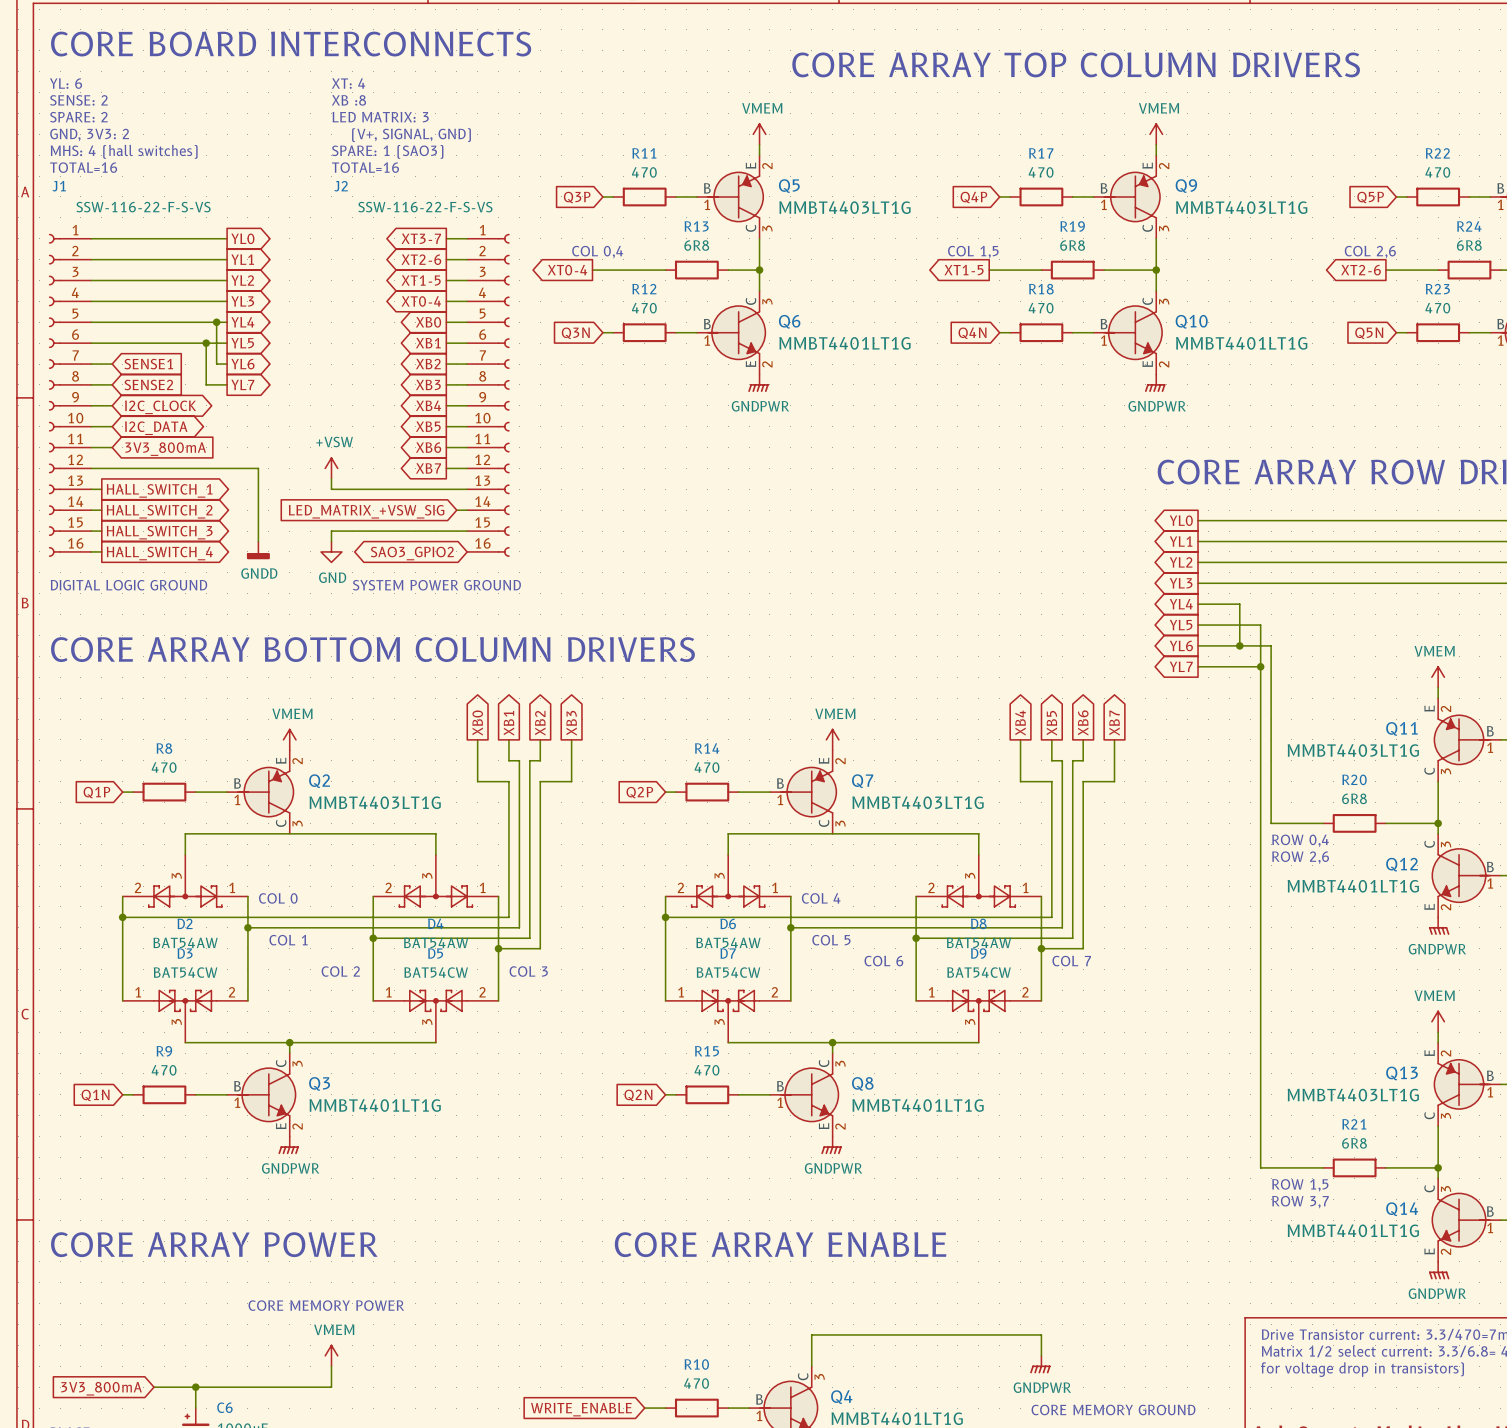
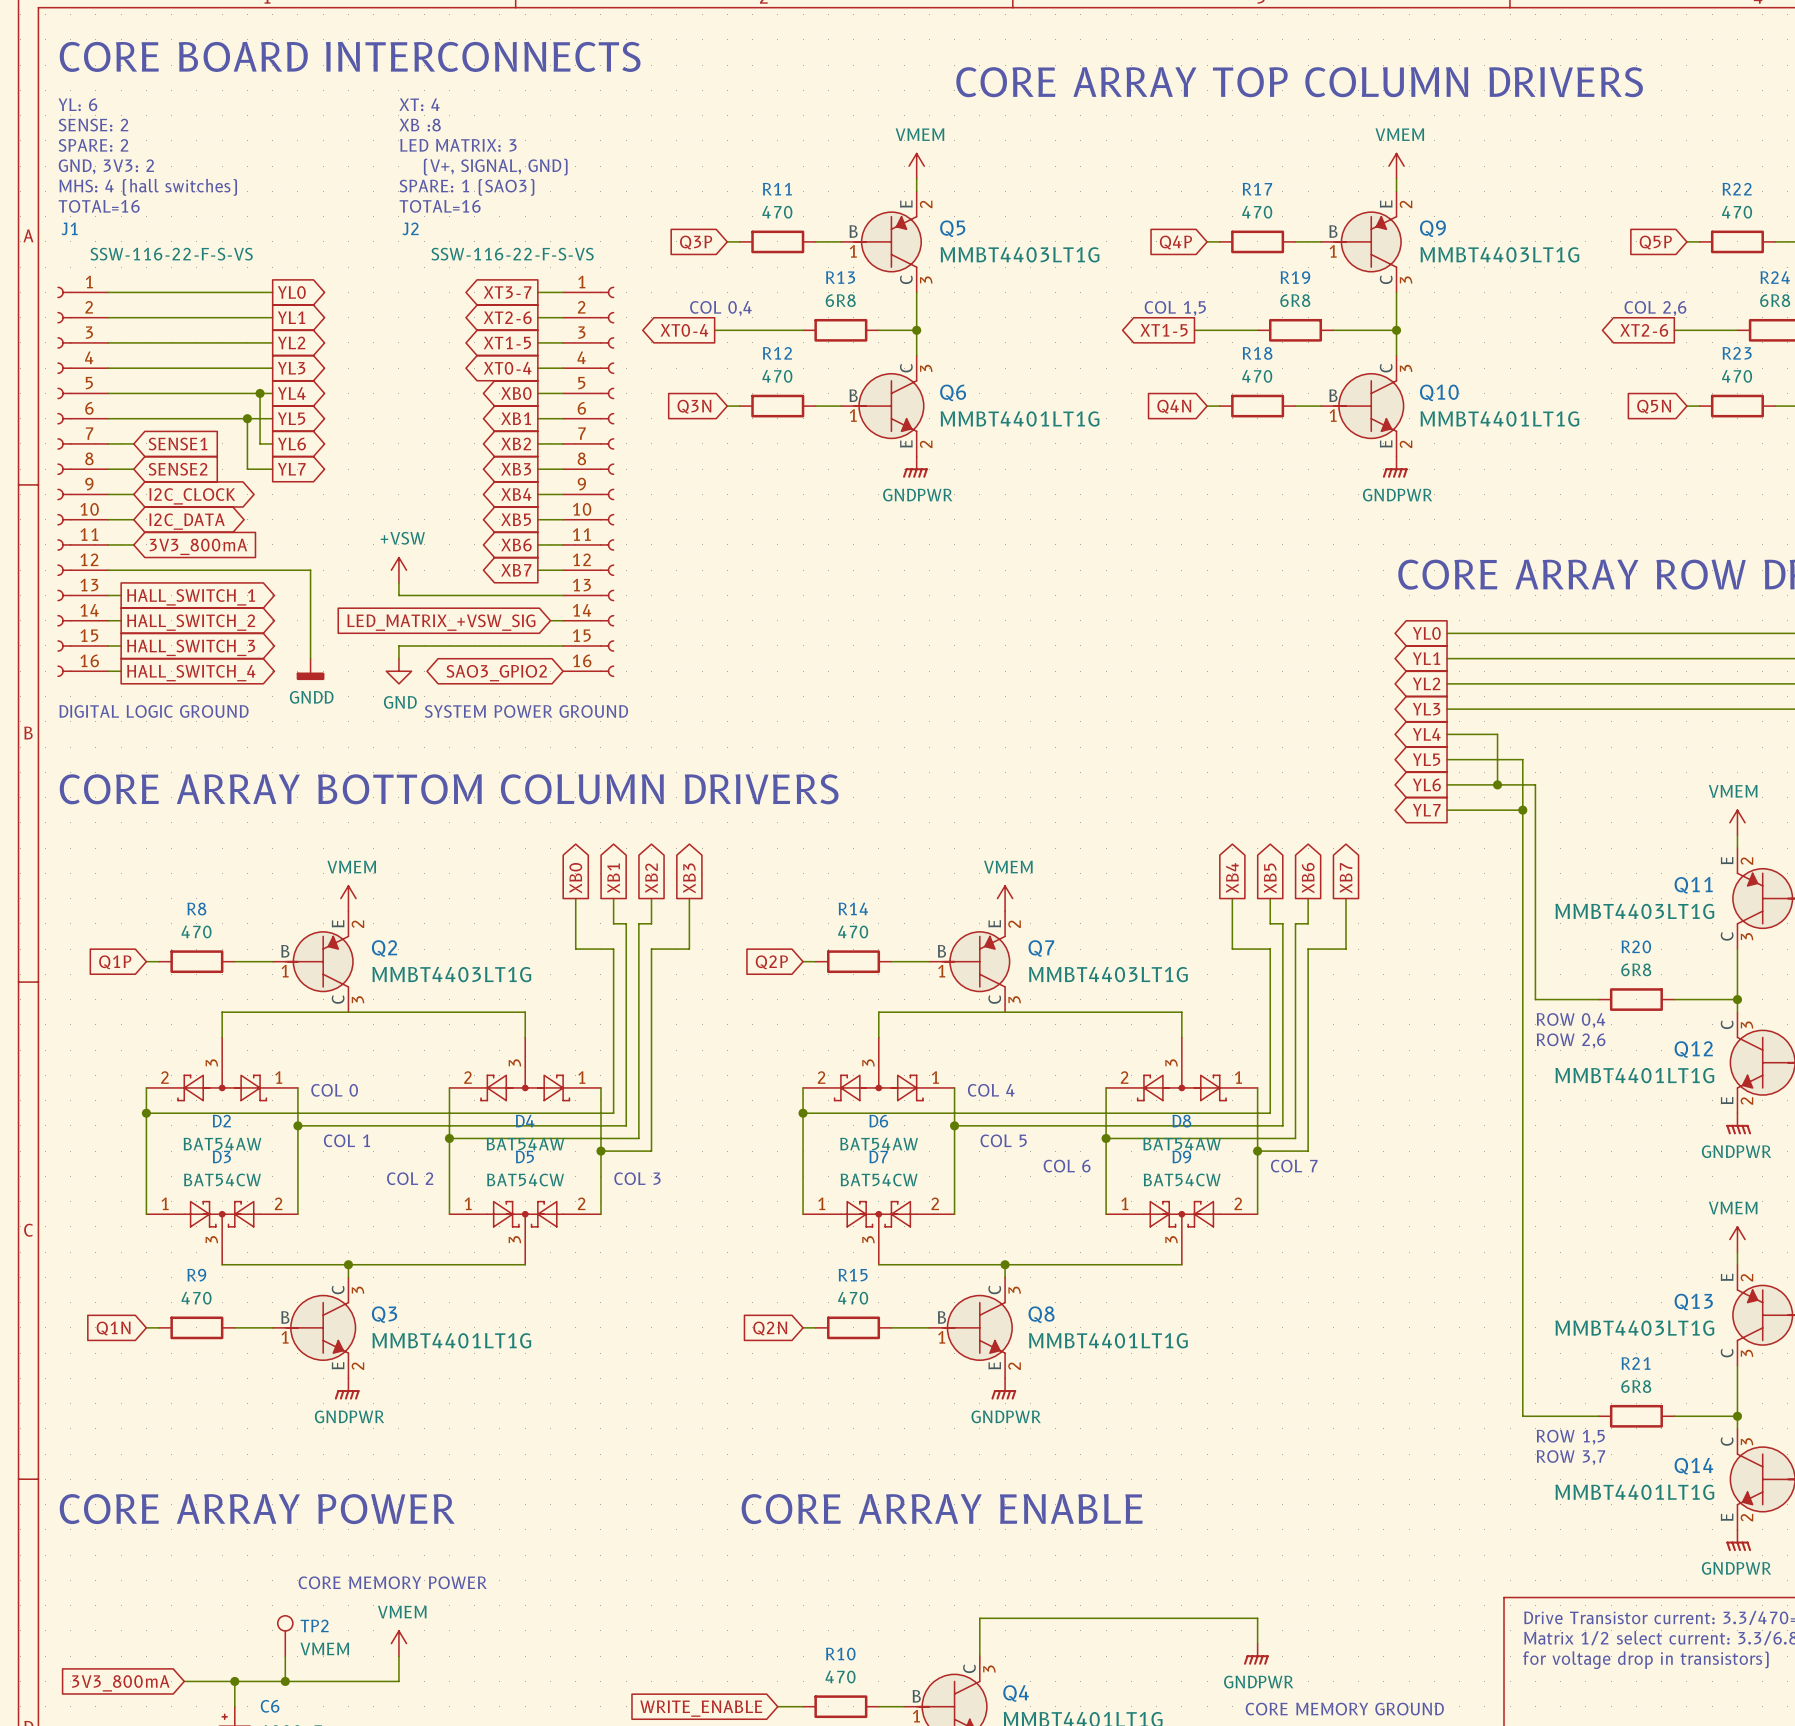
TP2: none -> VMEM (285, 1635)
wire: none -> (285, 1656) (285, 1681)
junction: none -> (285, 1681)

